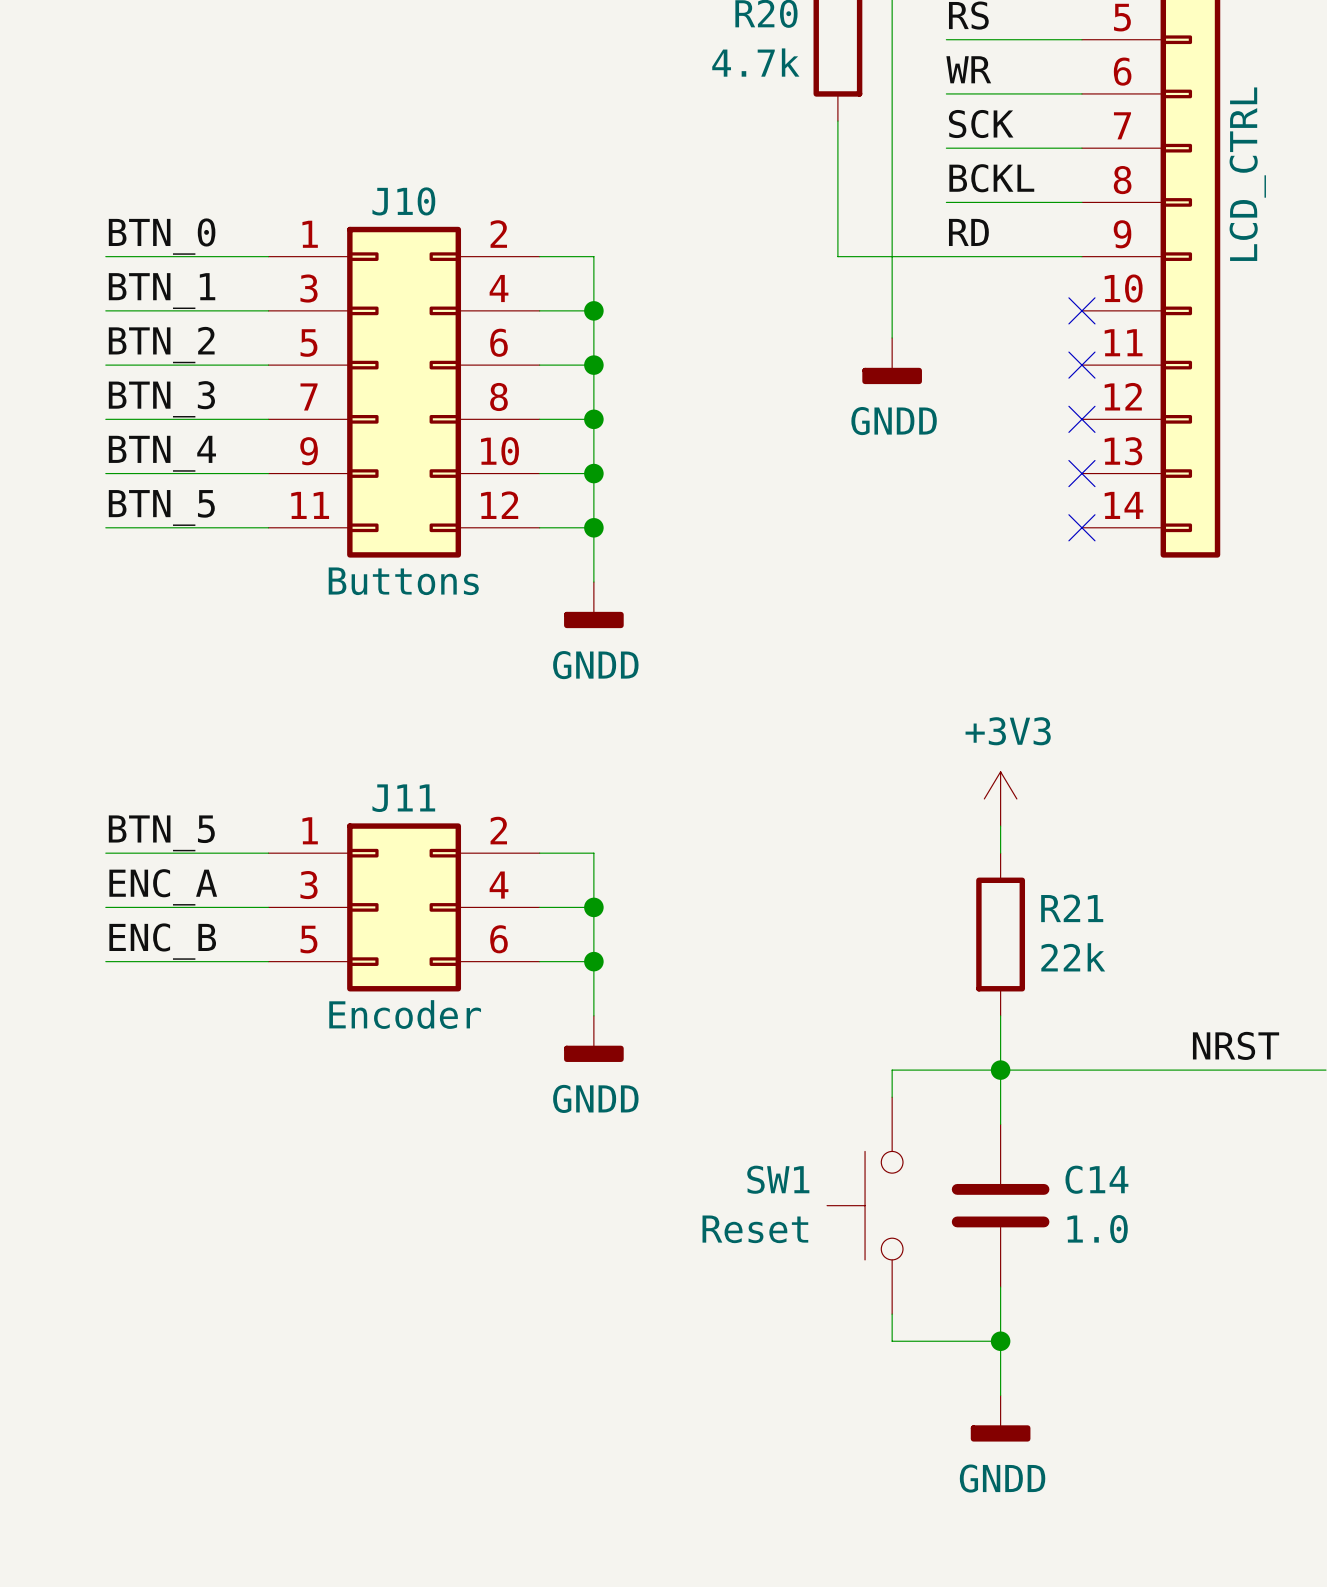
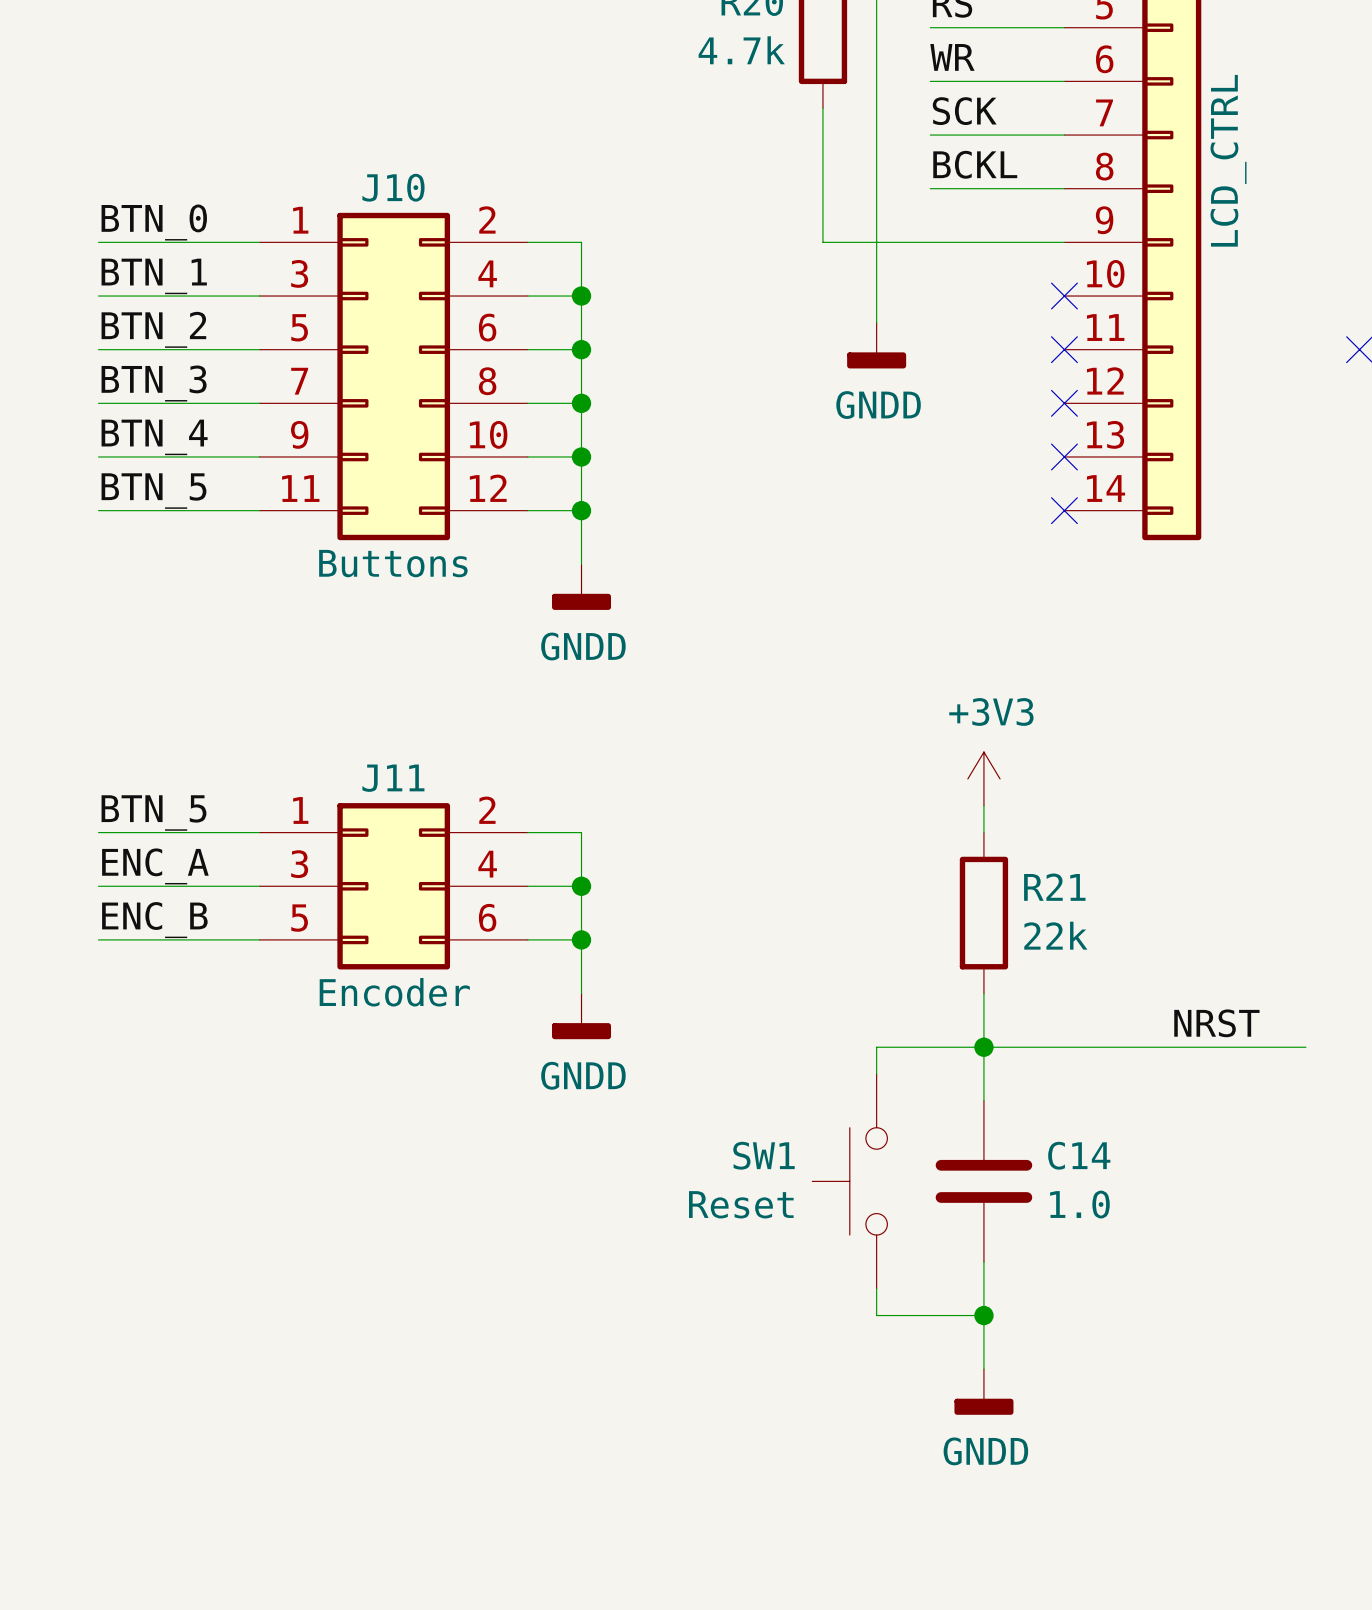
label: RD (968, 232) -> none

